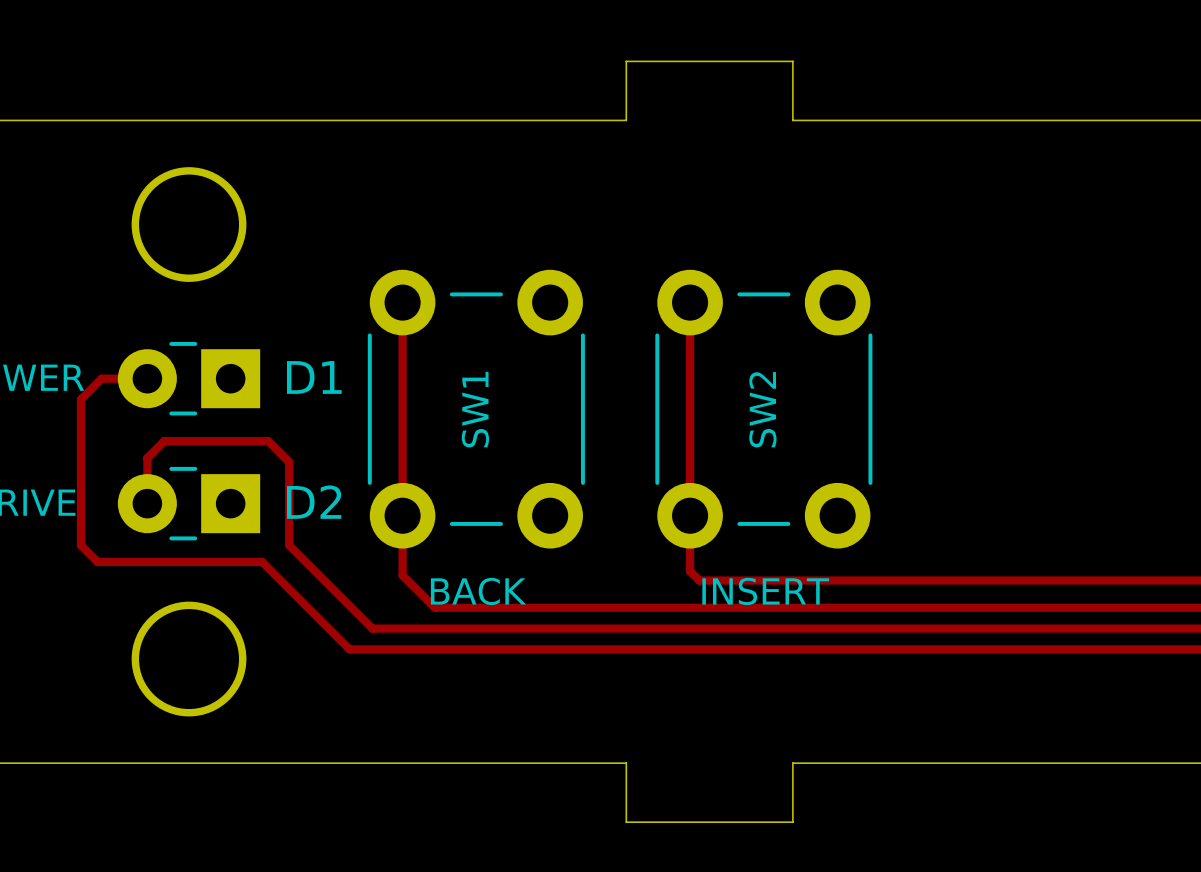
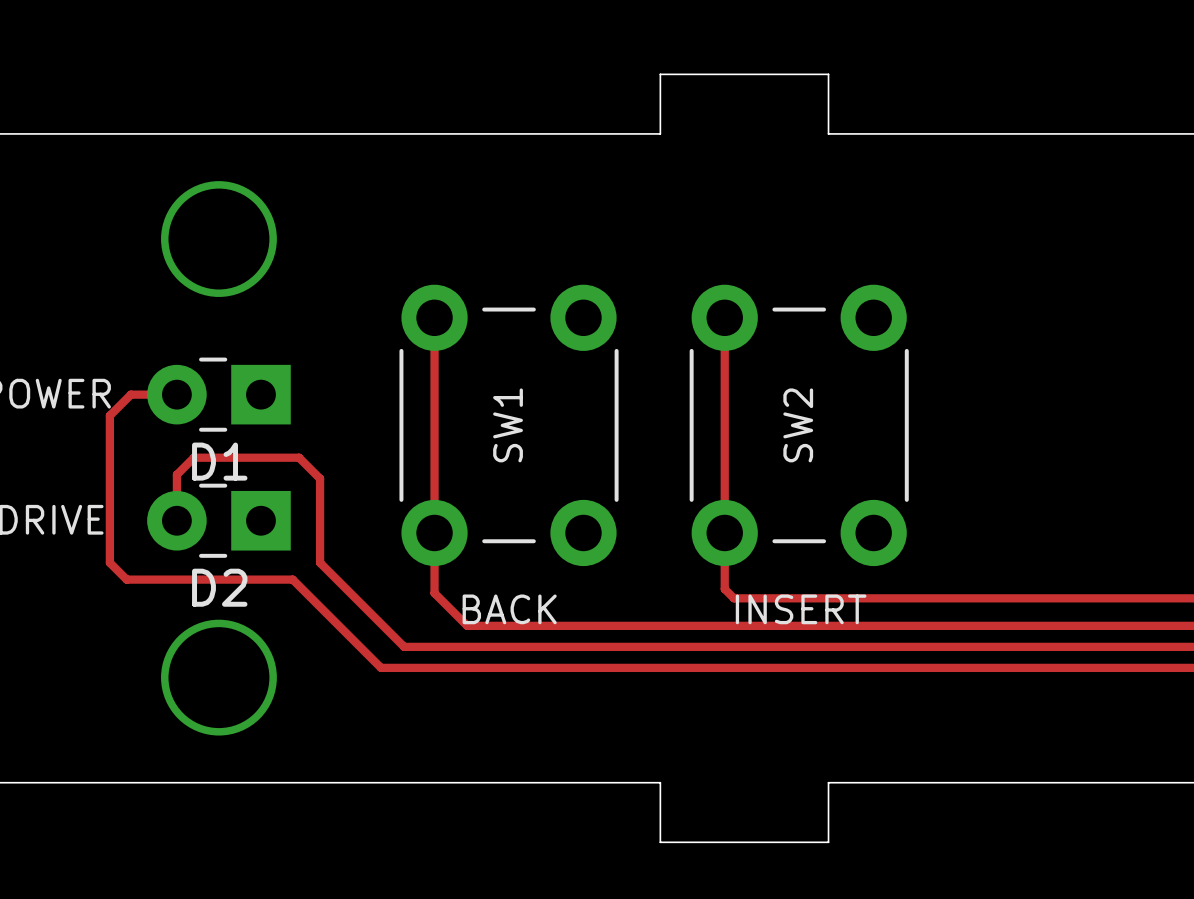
D1 name position: D1 (314, 377) -> D1 (219, 461)
D2 name position: D2 (314, 502) -> D2 (219, 587)

